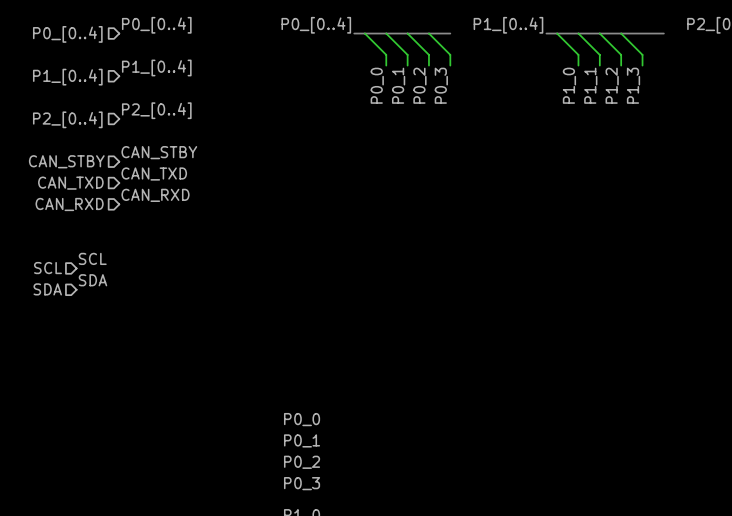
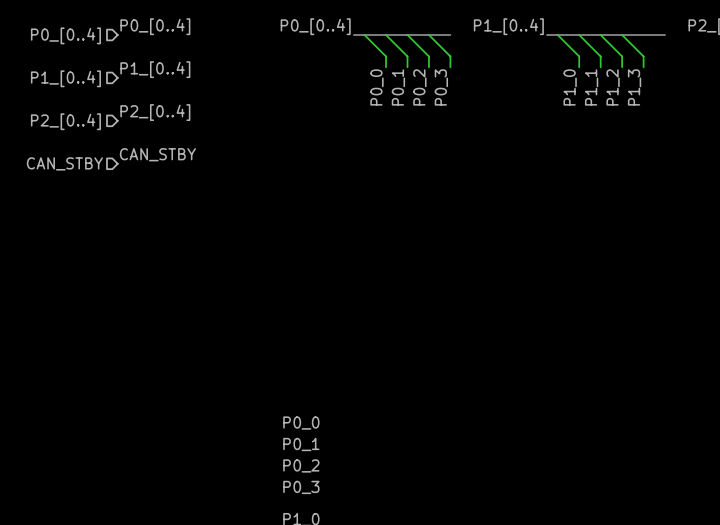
label: CAN_TXD (154, 174) -> none
hierarchical label: CAN_TXD (70, 183) -> none
label: CAN_RXD (155, 195) -> none
hierarchical label: CAN_RXD (69, 204) -> none
label: SCL (92, 258) -> none
hierarchical label: SCL (47, 268) -> none
label: SDA (92, 280) -> none
hierarchical label: SDA (47, 289) -> none

